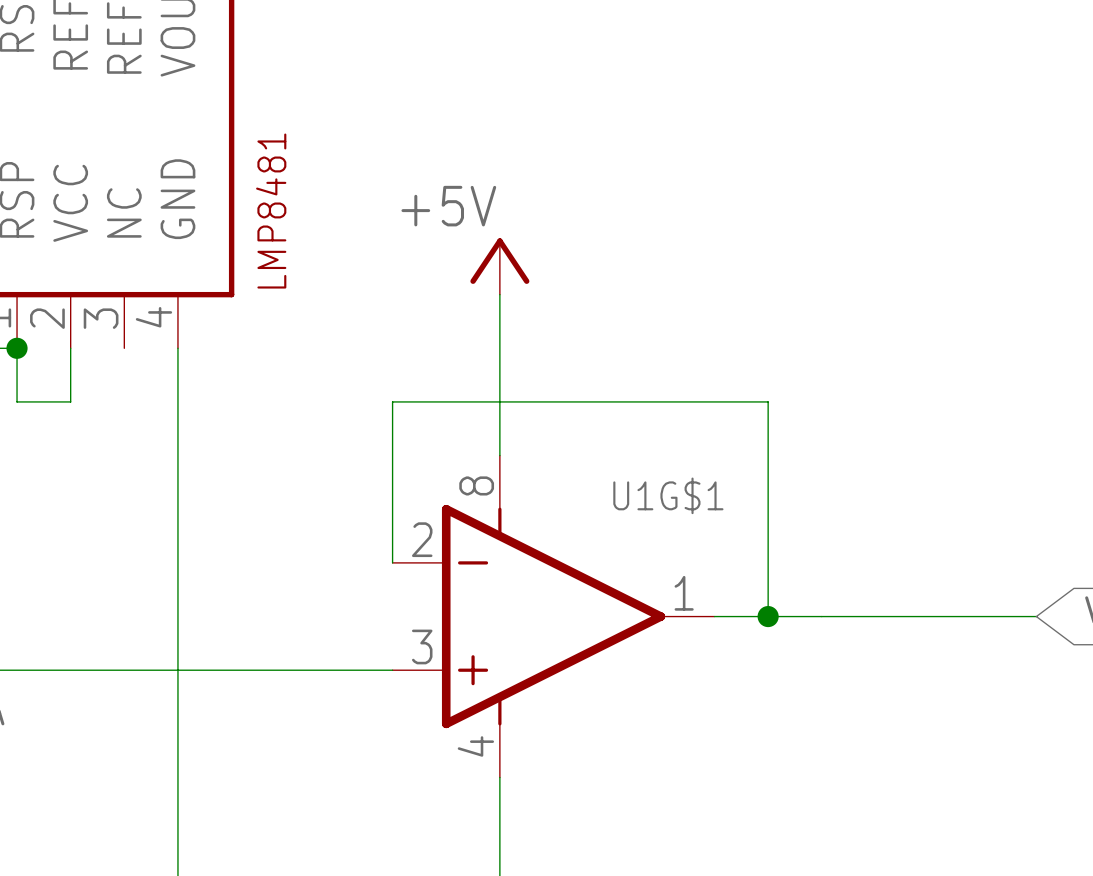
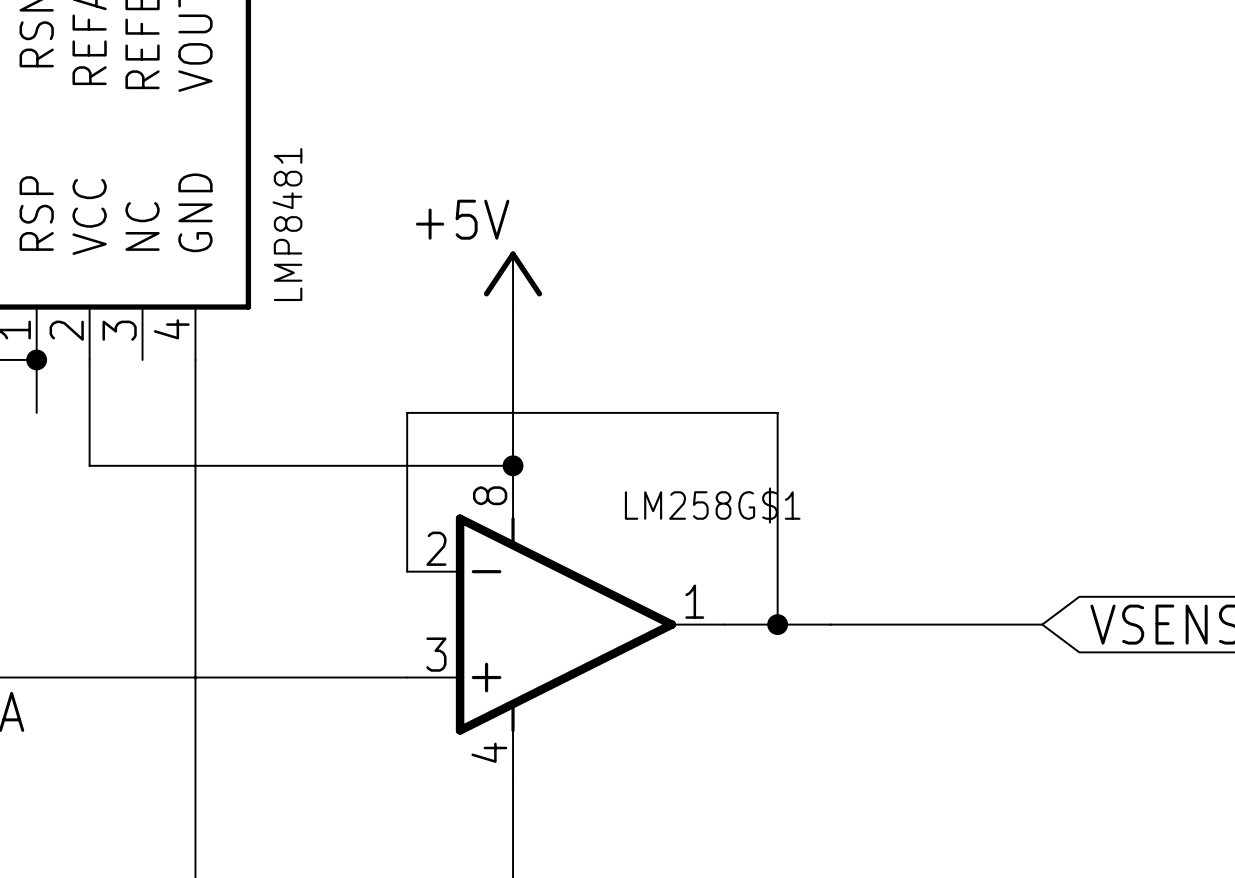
wire: (17, 401) (70, 401) -> (513, 465) (89, 465) (89, 412)
junction: none -> (513, 465)
U1G$1 name: U1G$1 (668, 495) -> LM258G$1 (712, 505)

